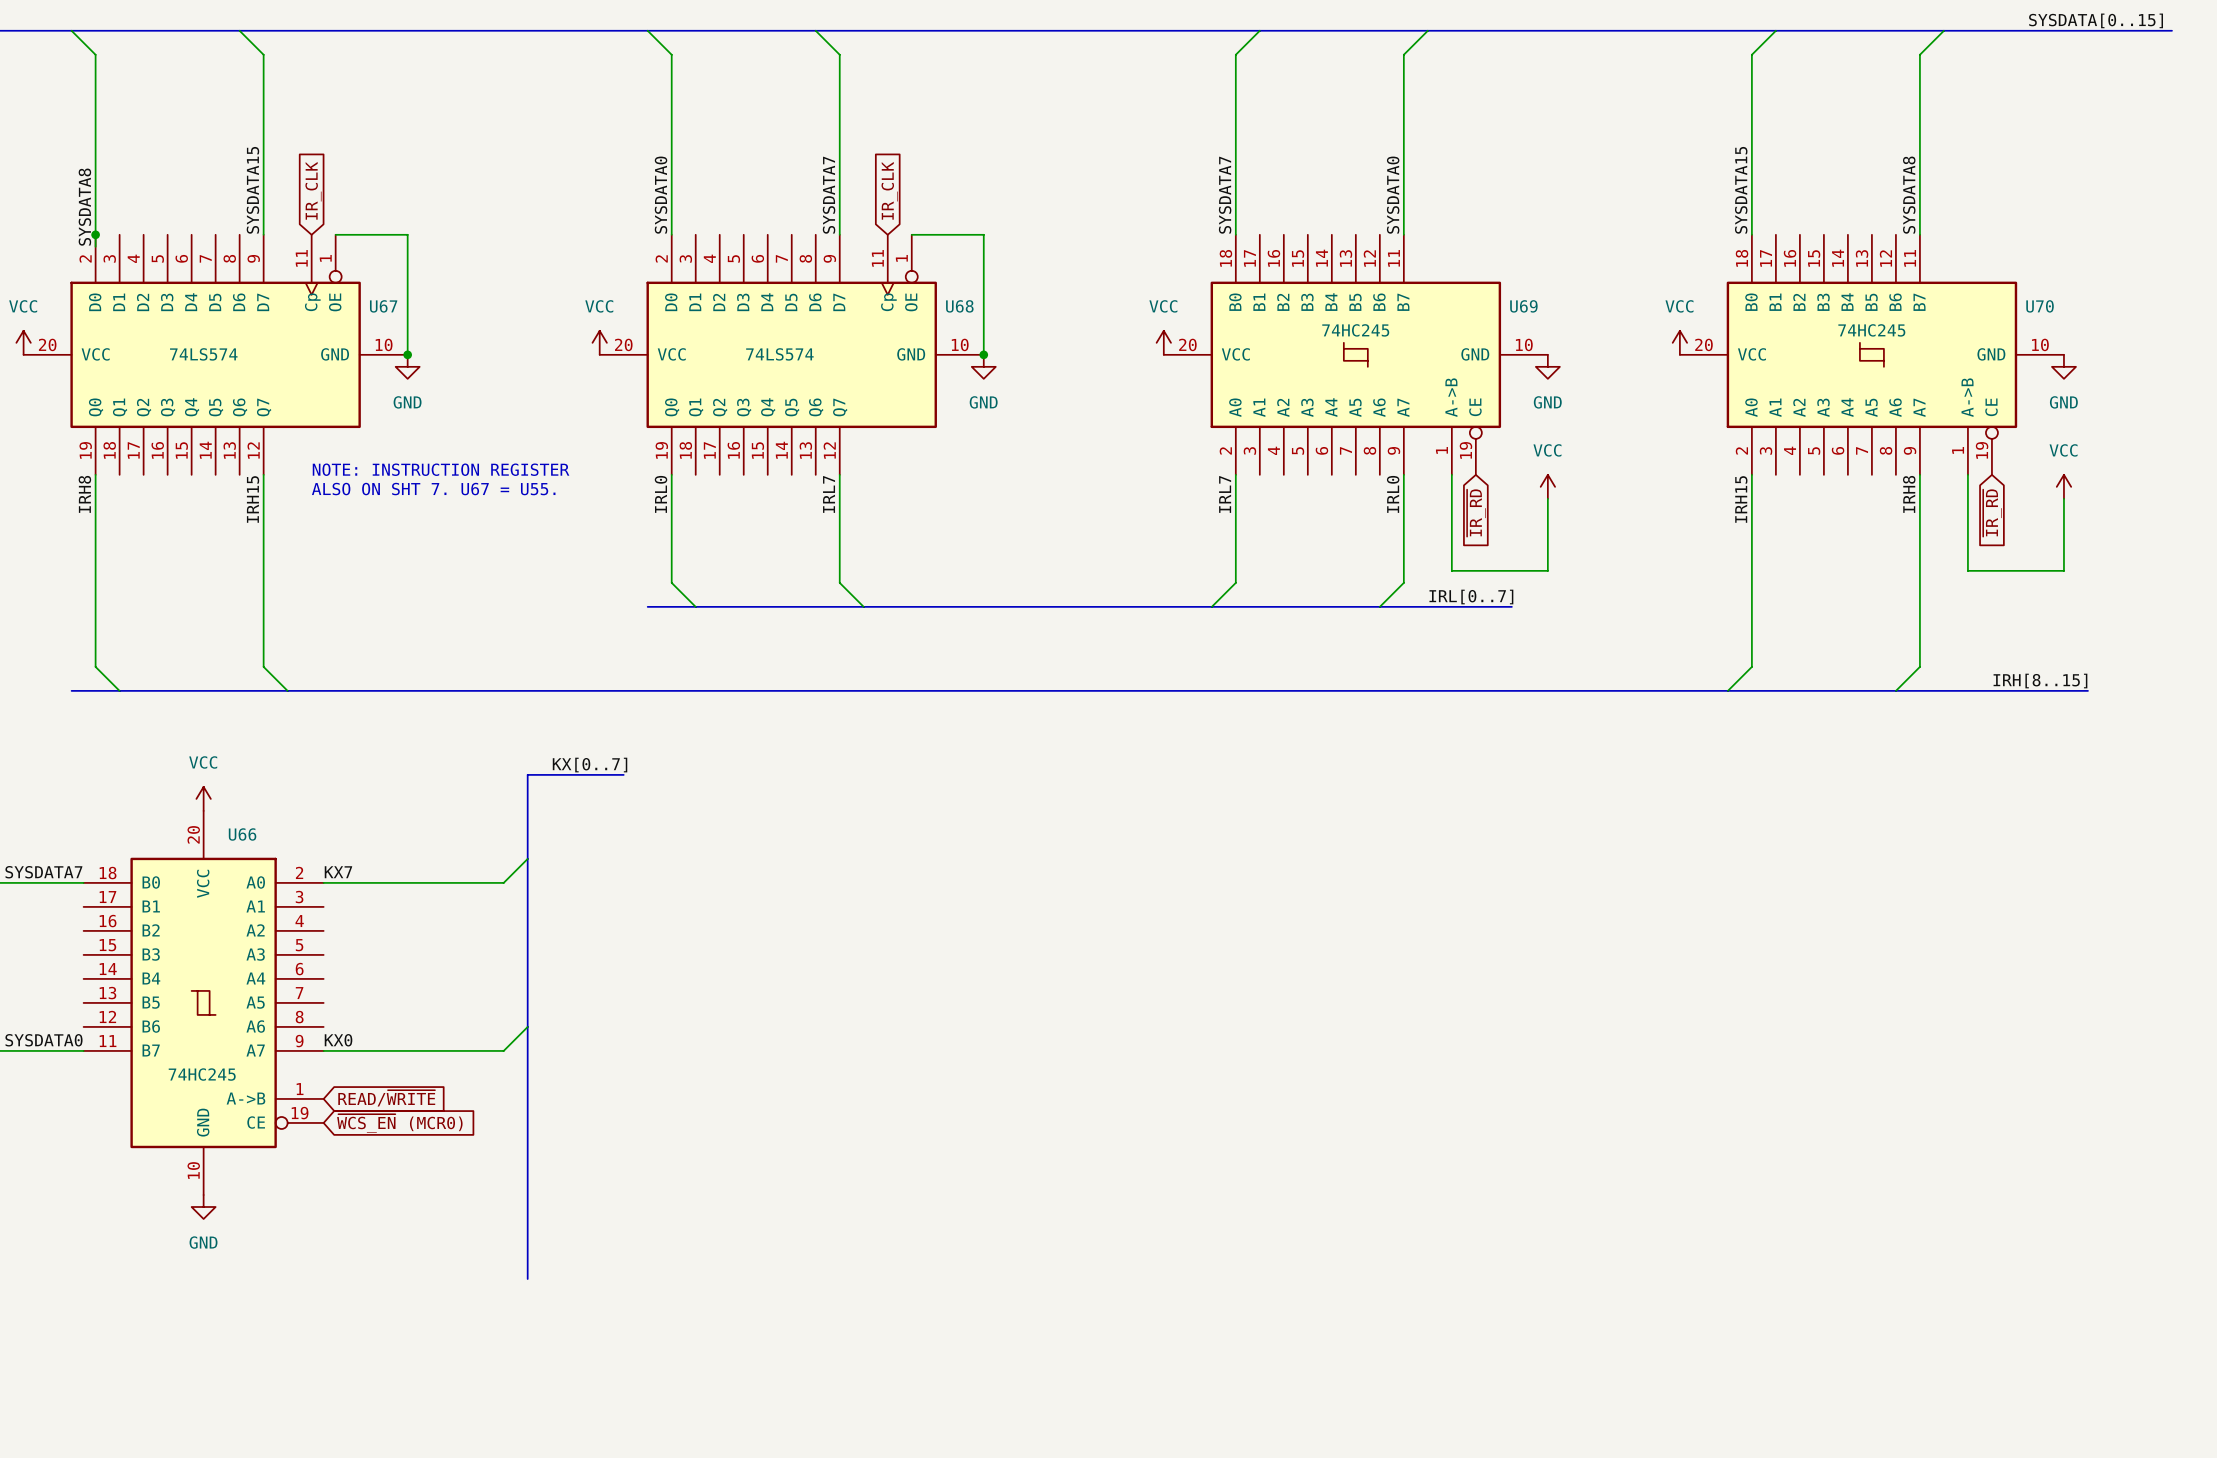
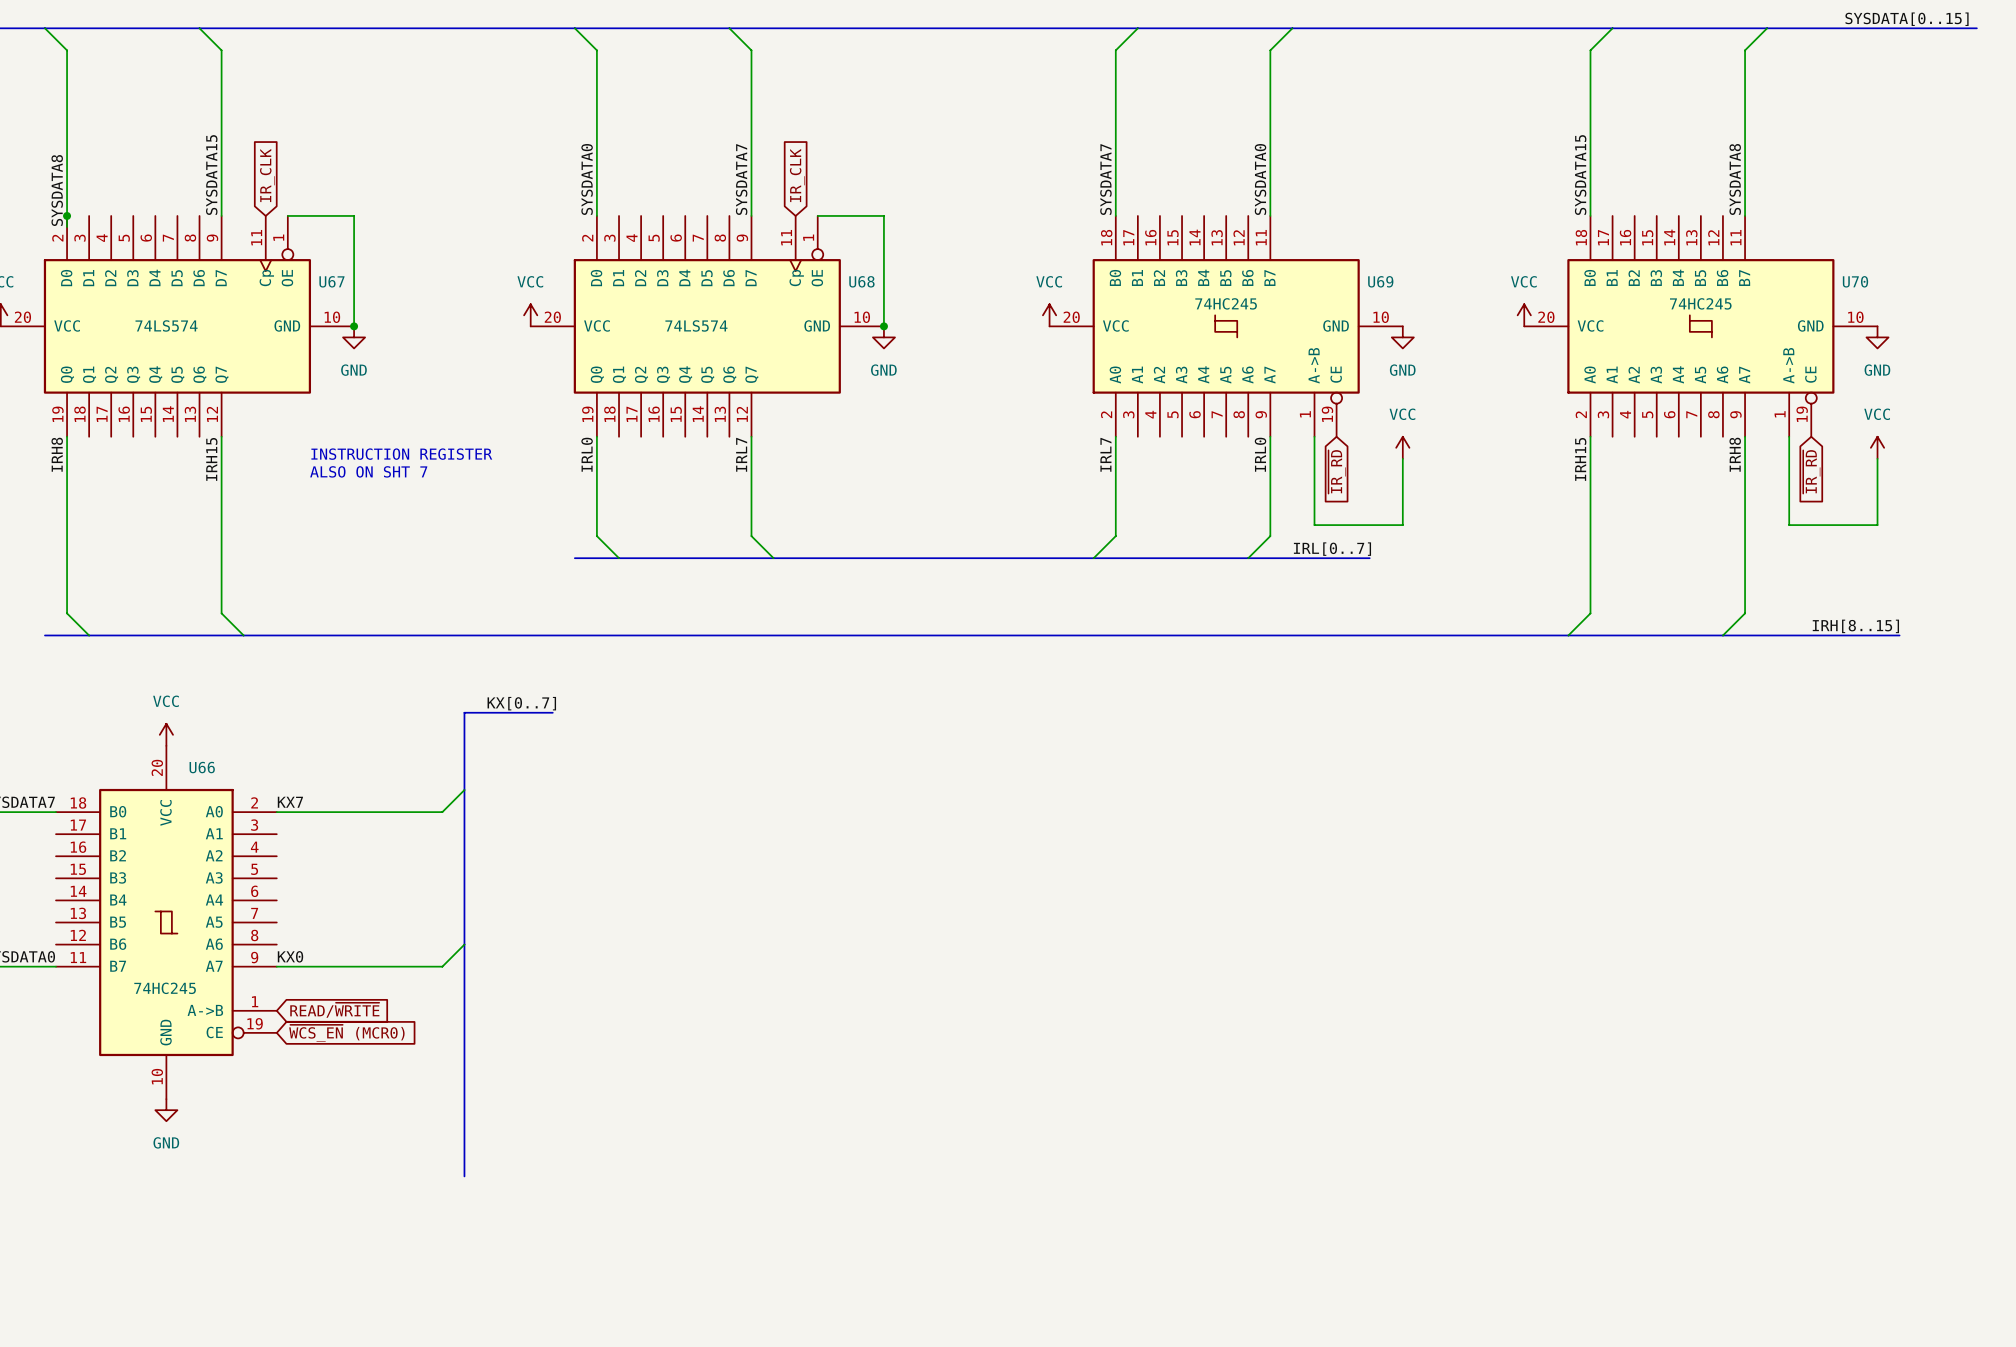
text: NOTE: INSTRUCTION REGISTER (441, 469) -> INSTRUCTION REGISTER (401, 454)
text: ALSO ON SHT 7. U67 = U55. (433, 489) -> ALSO ON SHT 7 (368, 471)

